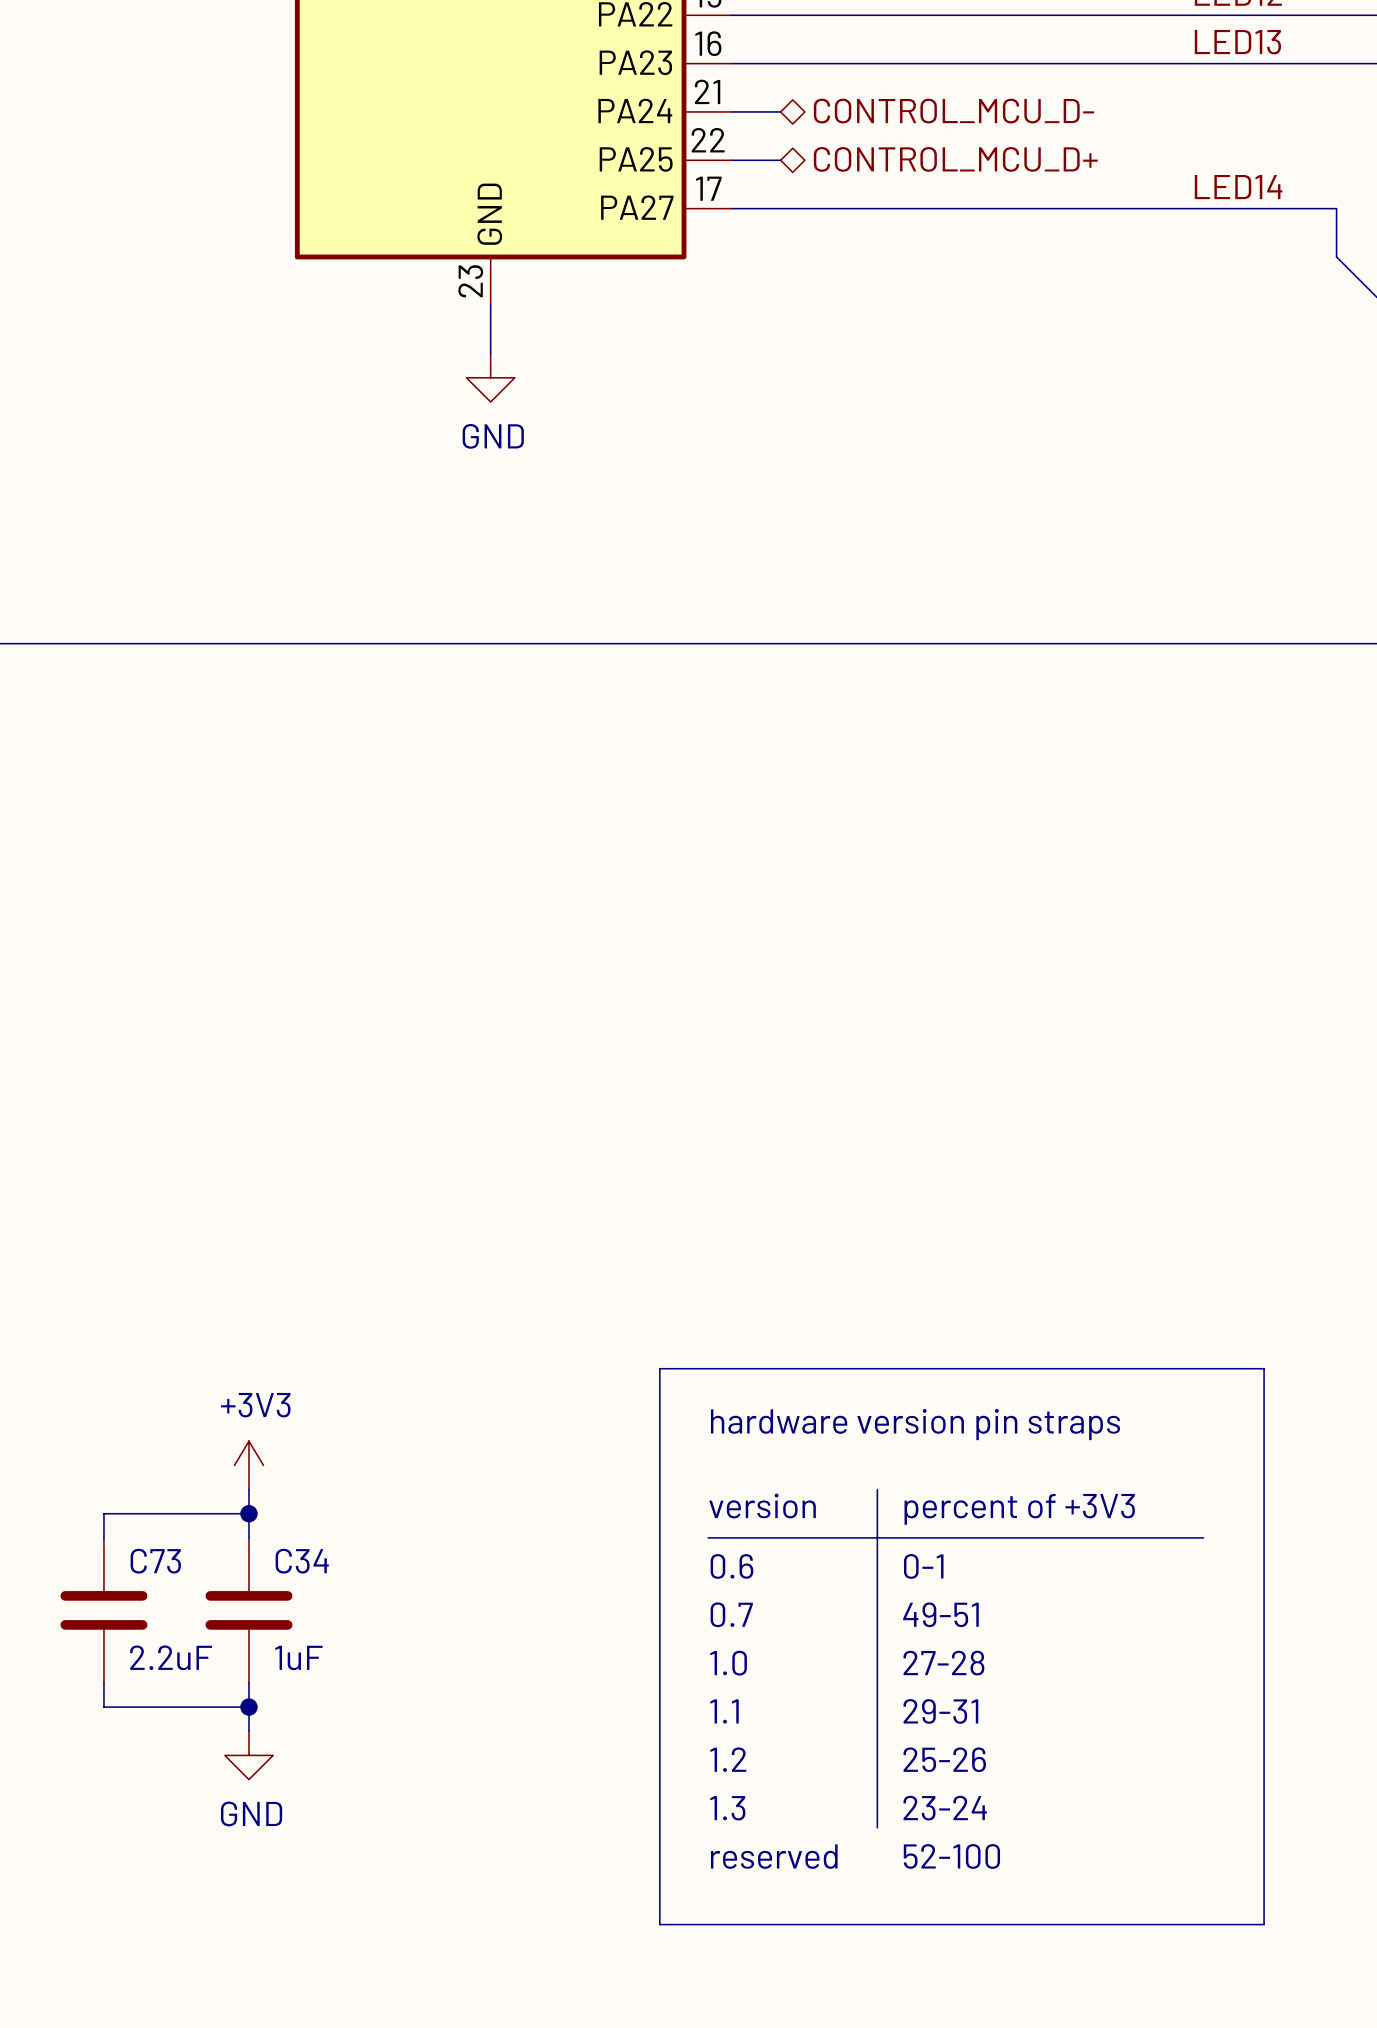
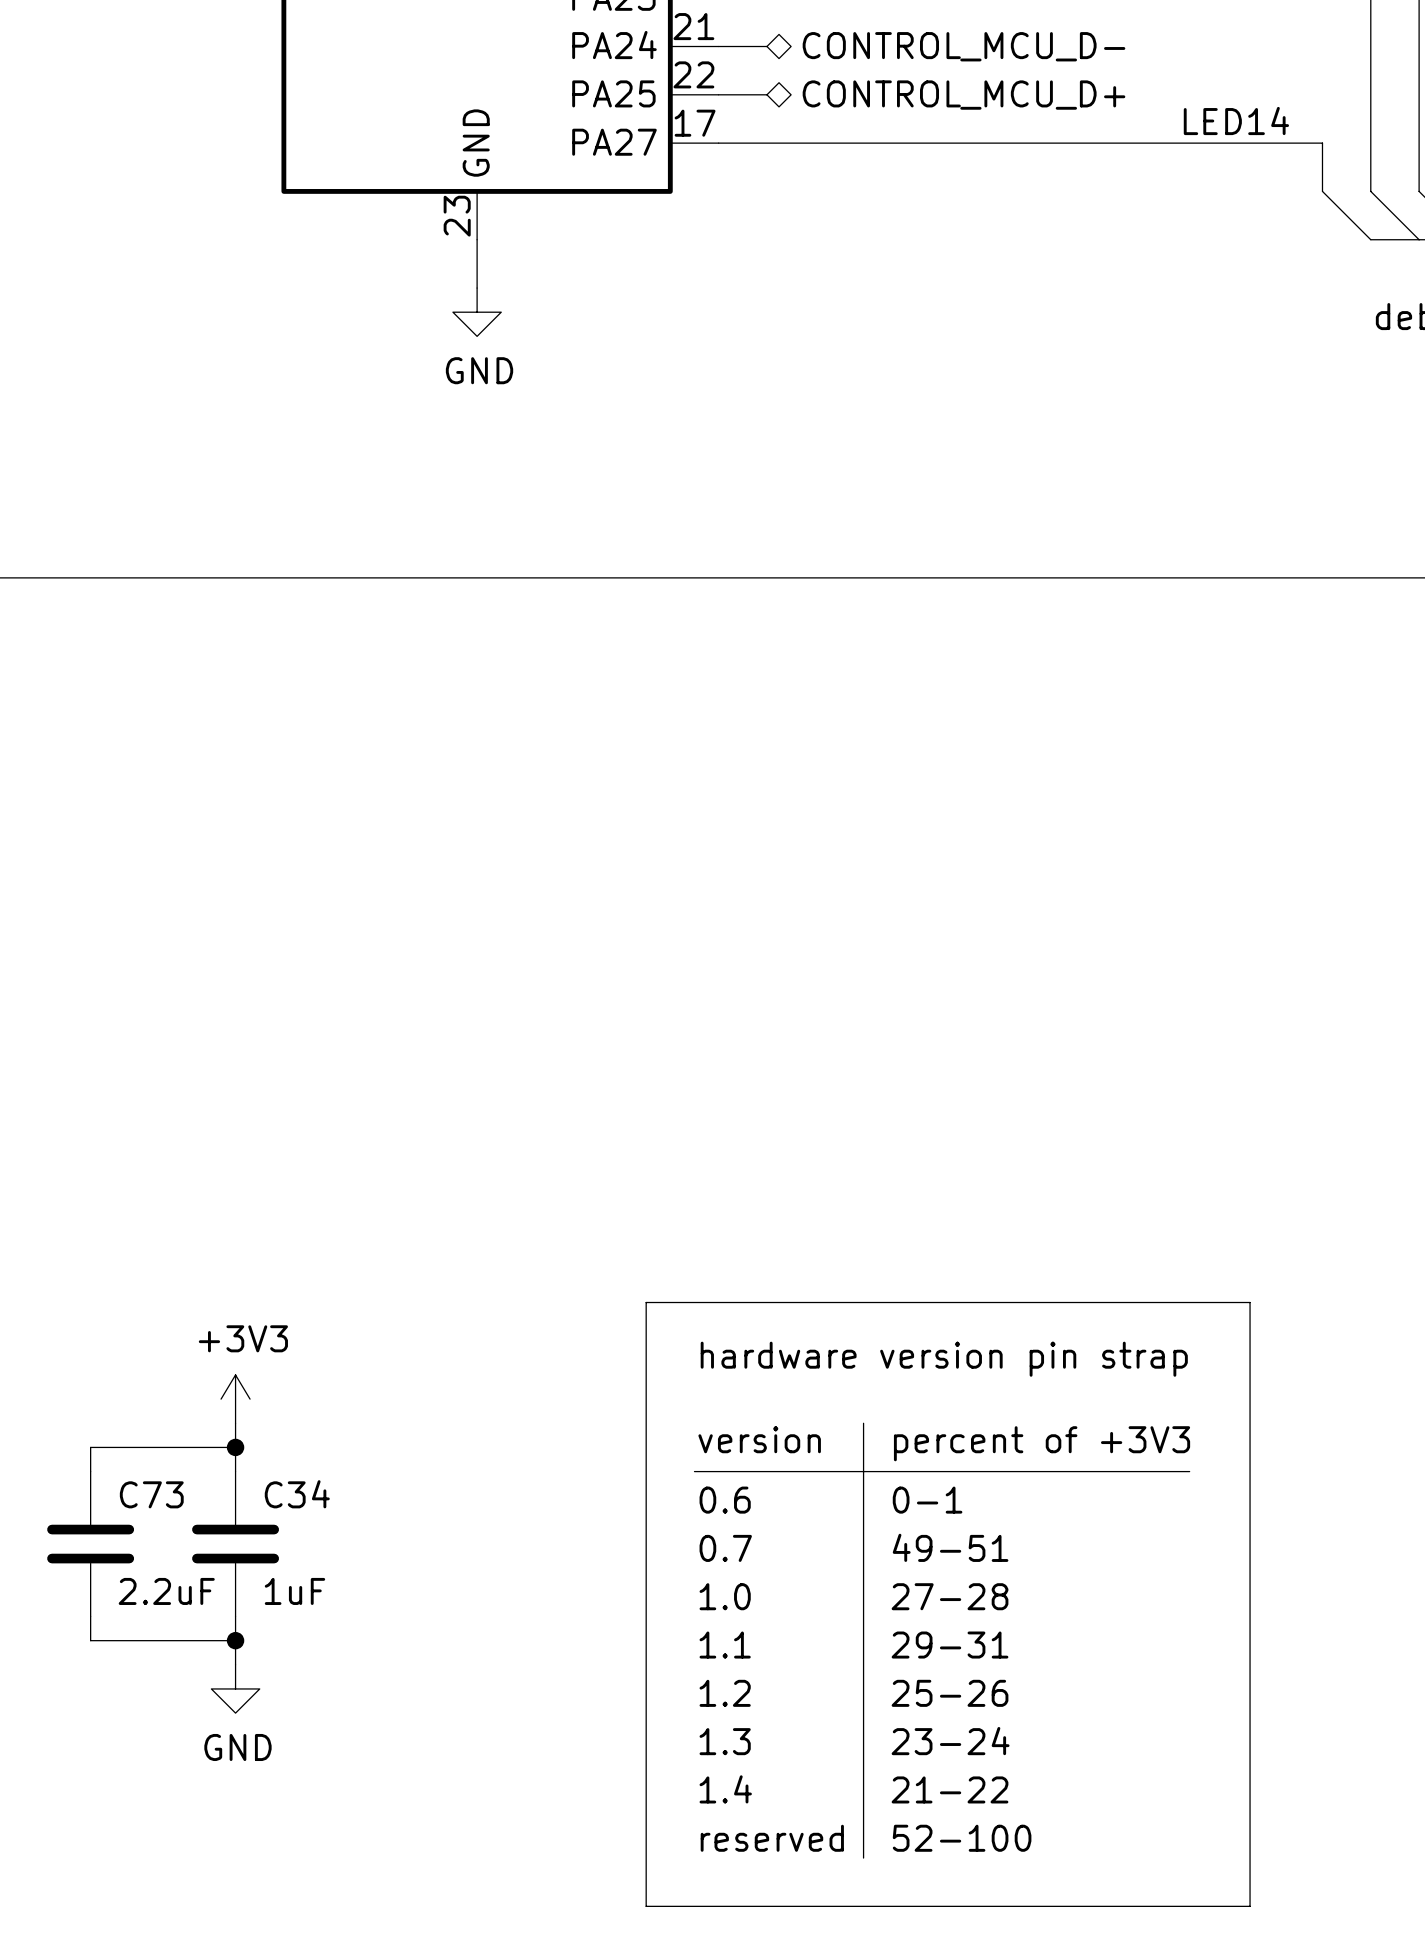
text: hardware version pin straps (915, 1424) -> hardware version pin strap (944, 1359)
line: none -> (863, 1761) (863, 1858)
text: reserved (774, 1856) -> 1.4 (725, 1789)
text: 52-100 (951, 1856) -> 21-22 (950, 1789)
text: none -> reserved (772, 1838)
text: none -> 52-100 (962, 1838)
line: (659, 1924) (1264, 1924) -> (646, 1858) (646, 1906) (1250, 1906) (1250, 1858)

